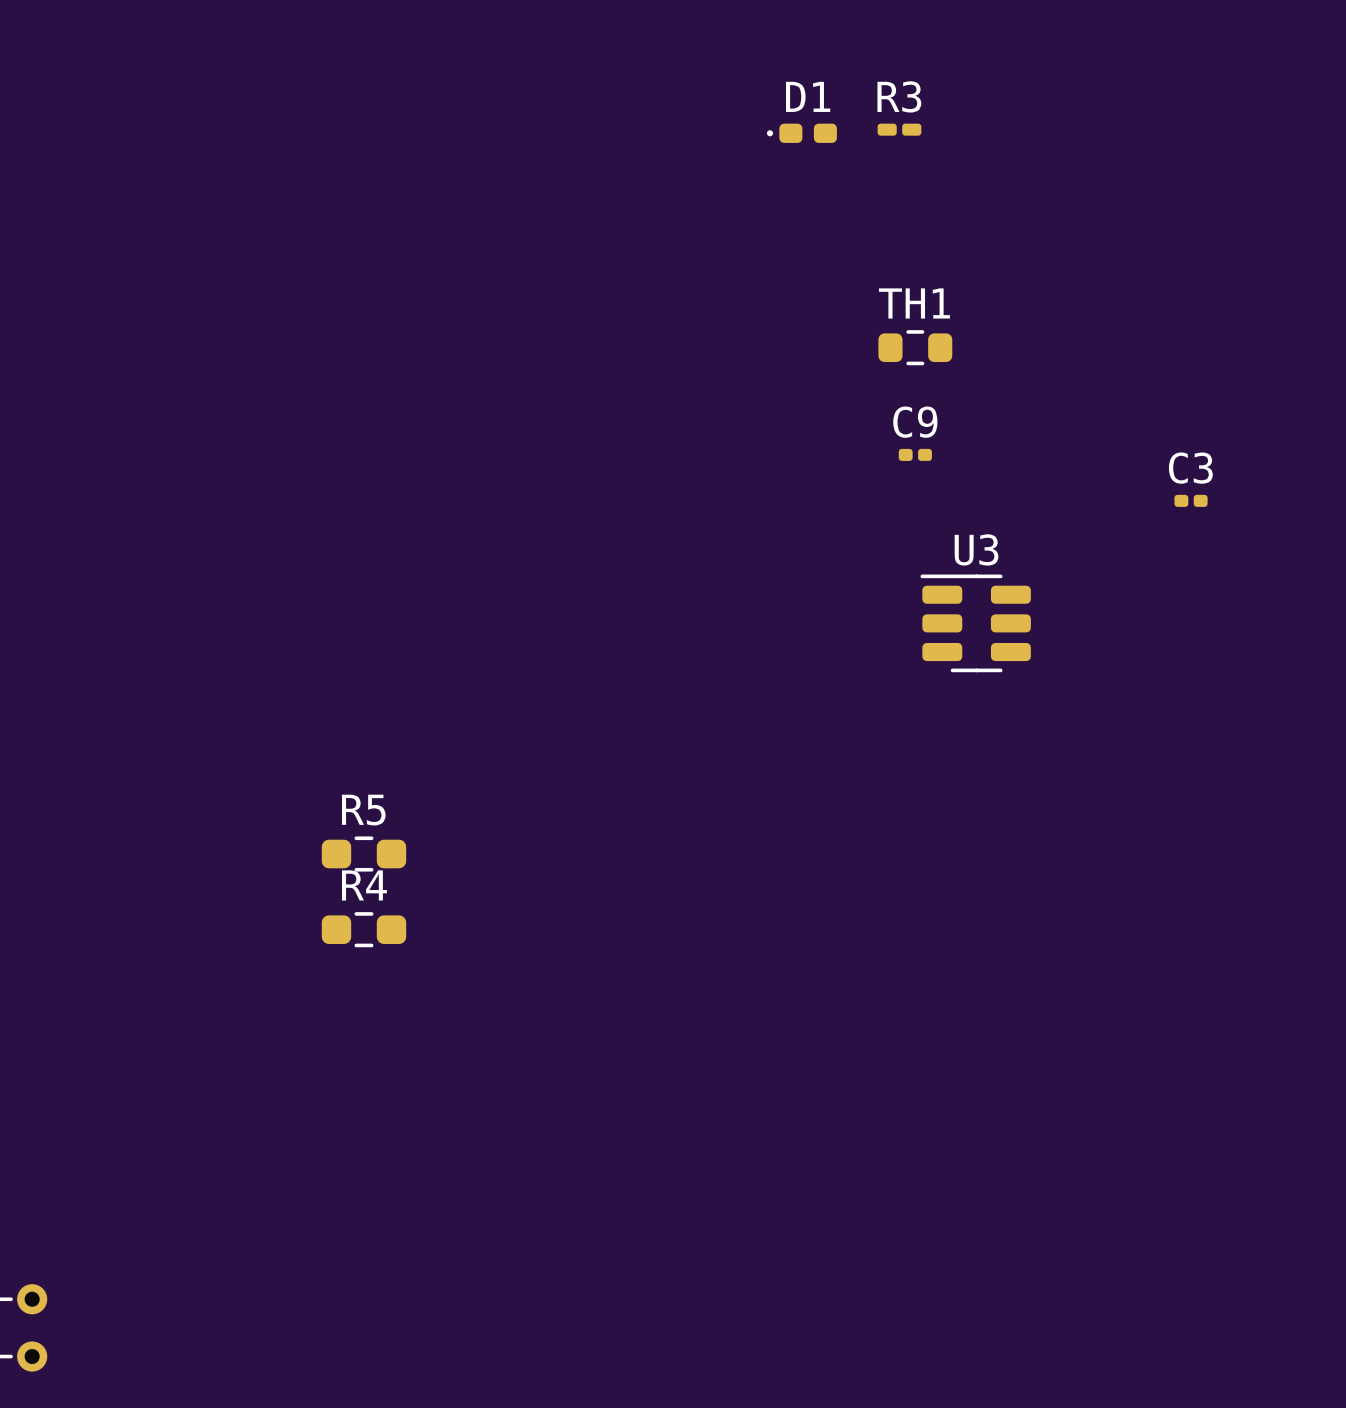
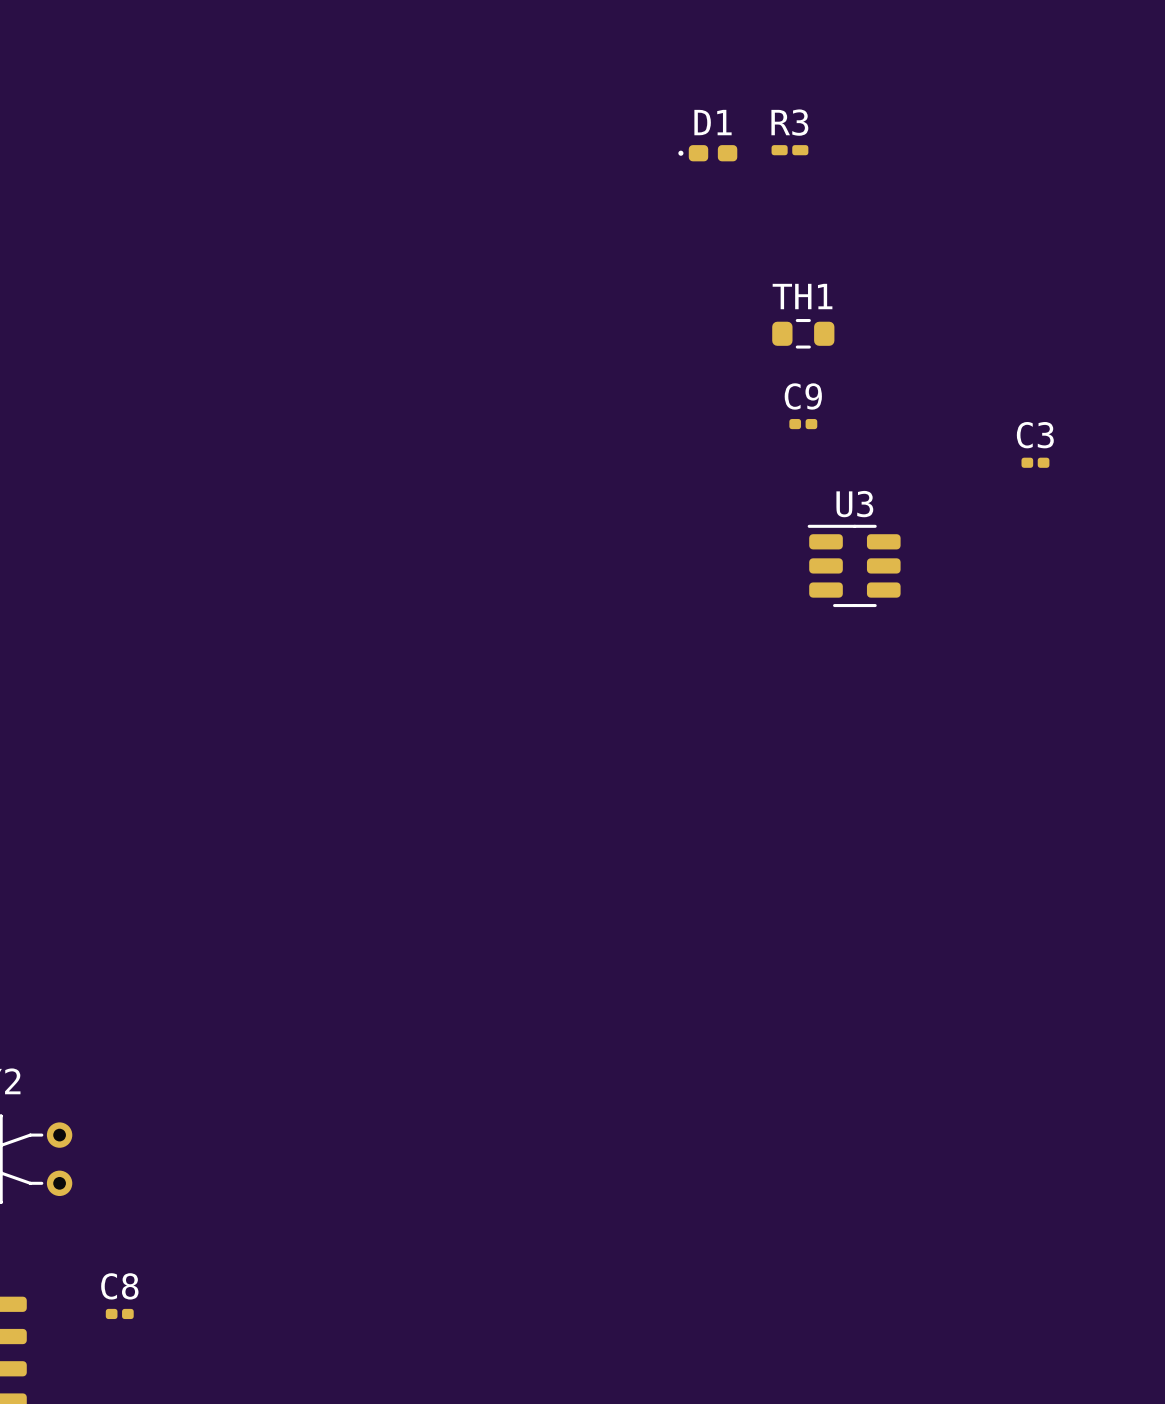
R5: (363, 854) -> none
R4: (363, 929) -> none

